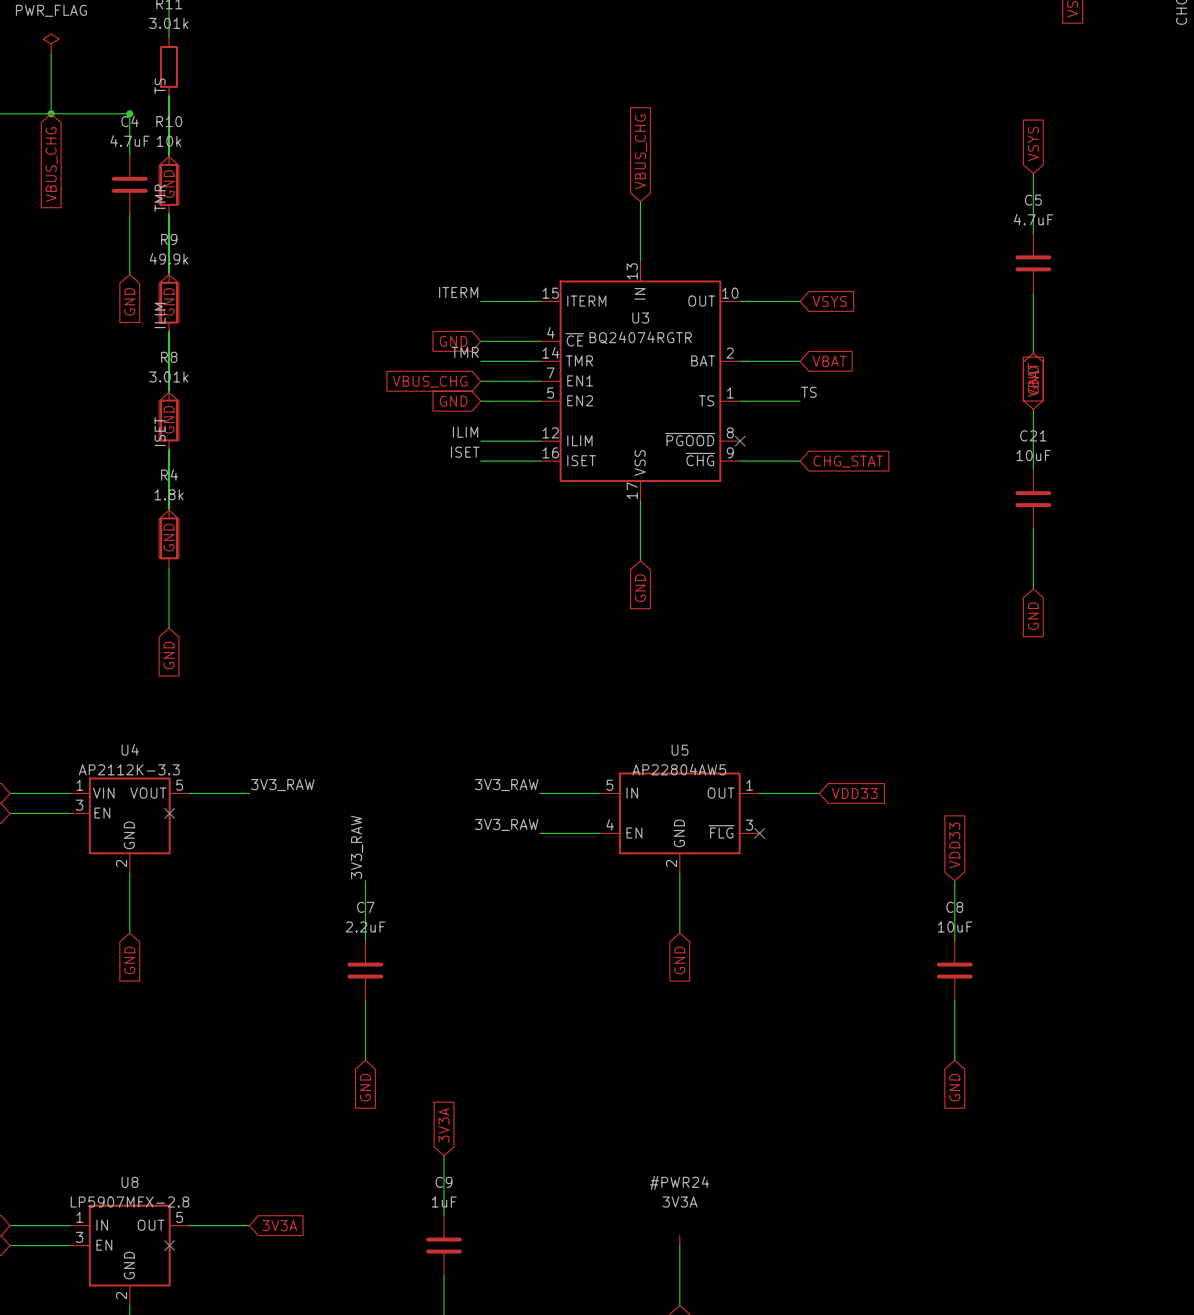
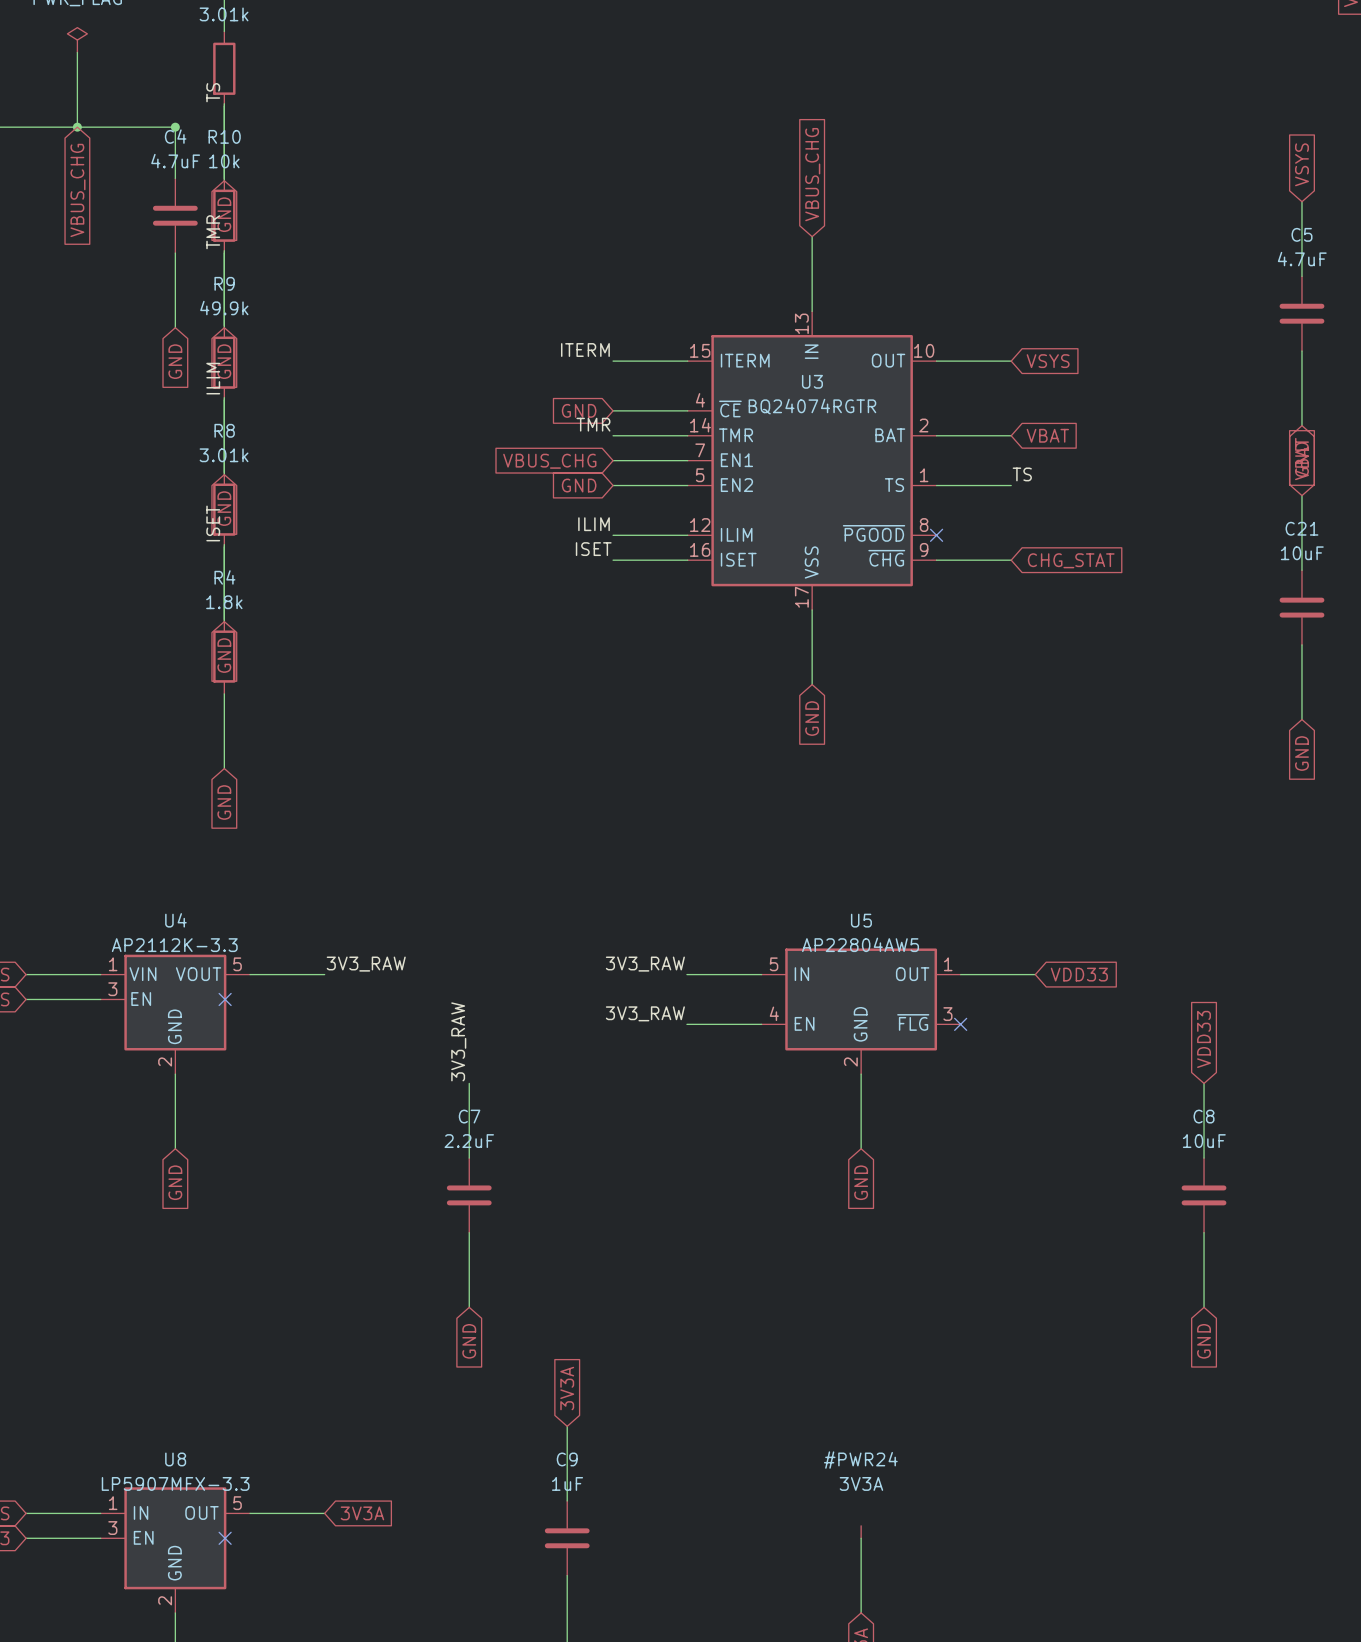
U8 value: LP5907MFX-2.8 (129, 1201) -> LP5907MFX-3.3 (175, 1483)

